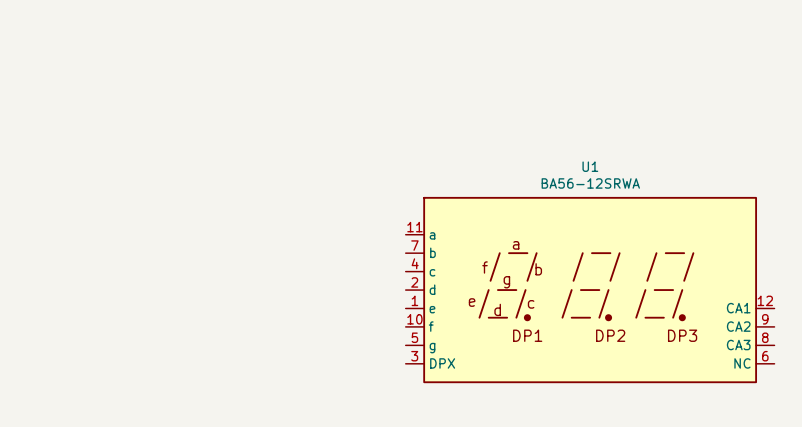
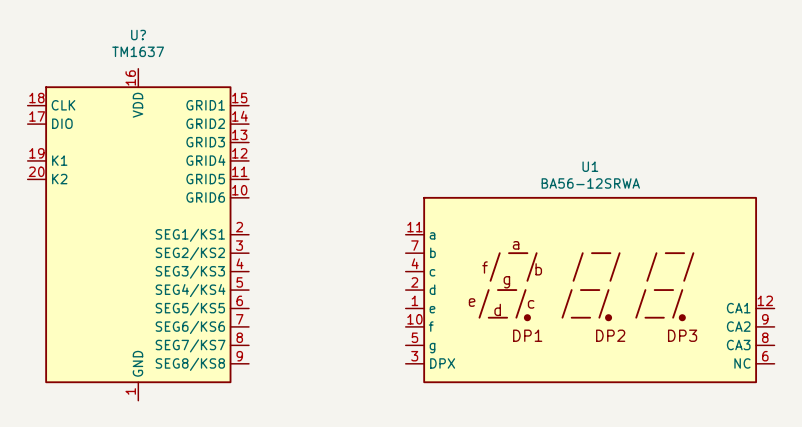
U?: none -> TM1637 (138, 234)

